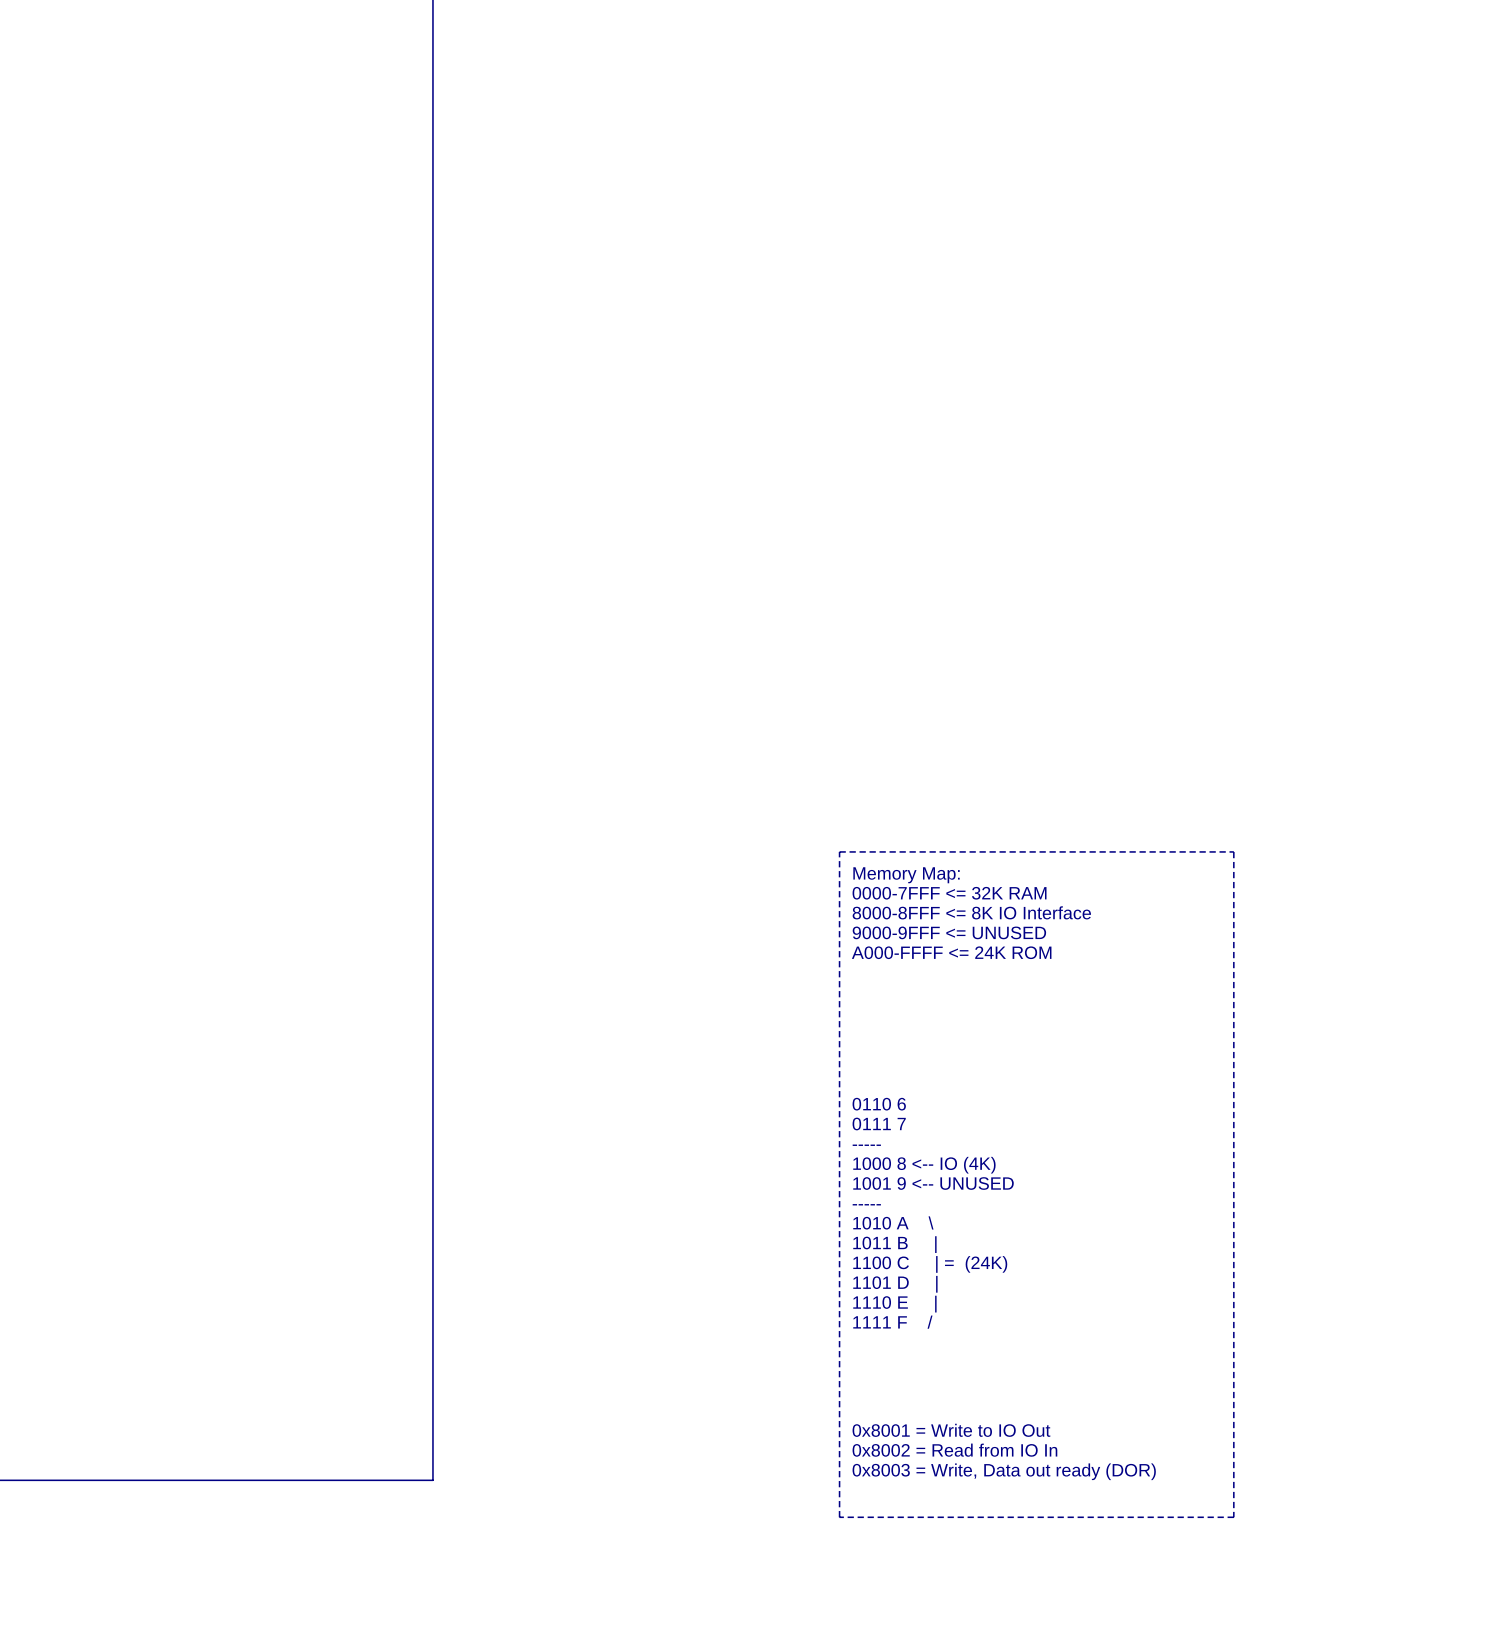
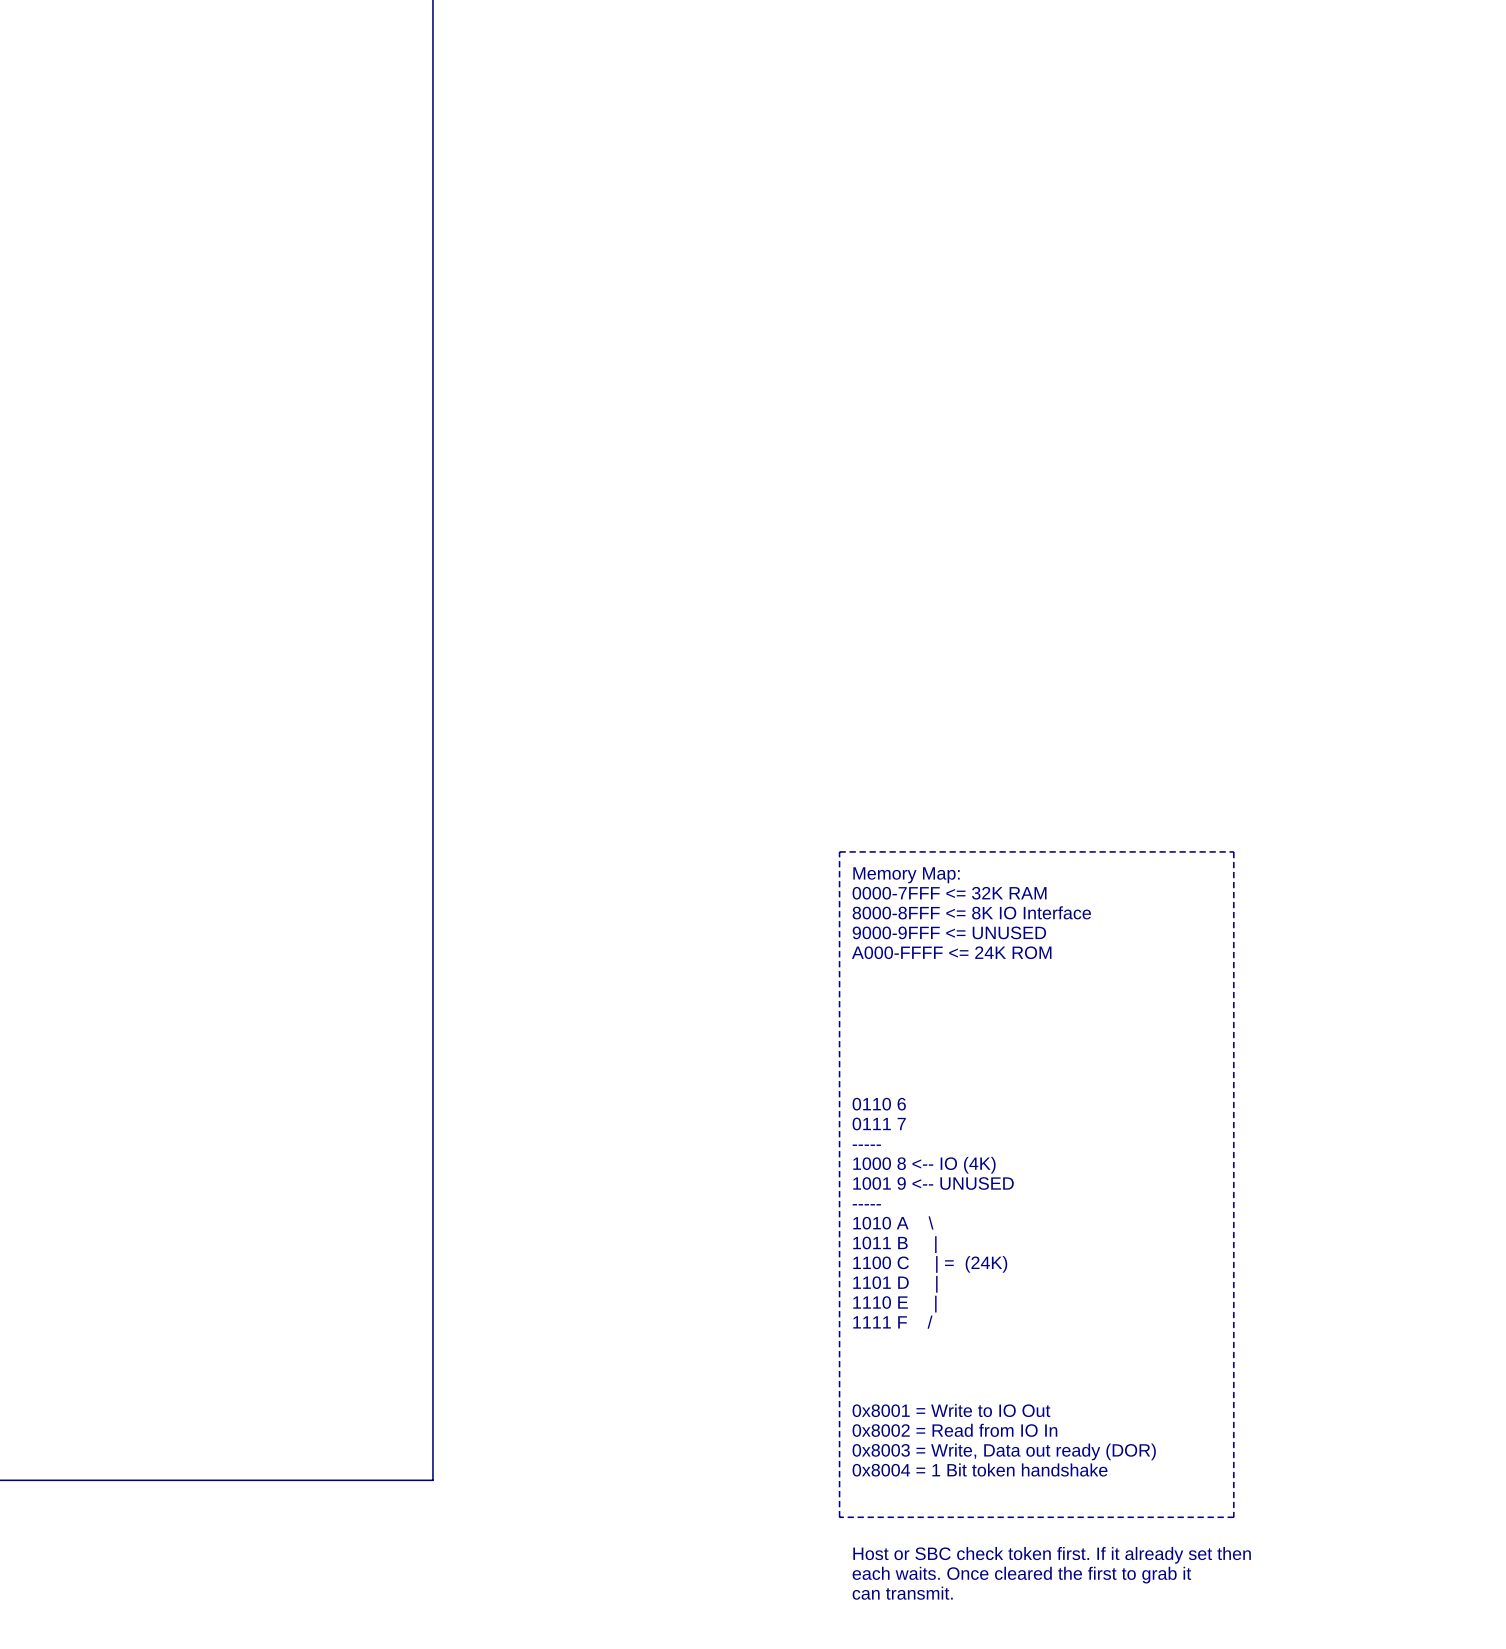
text: none -> 0x8001 = Write to IO Out (951, 1410)
text: 0x8001 = Write to IO Out (951, 1430) -> 0x8002 = Read from IO In (954, 1430)
text: 0x8002 = Read from IO In (954, 1450) -> 0x8003 = Write, Data out ready (DOR) (1004, 1451)
text: 0x8003 = Write, Data out ready (DOR) (1004, 1471) -> 0x8004 = 1 Bit token handshake (980, 1469)
text: none -> Host or SBC check token first. If it already set then (1052, 1555)
text: none -> each waits. Once cleared the first to grab it (1021, 1575)
text: none -> can transmit. (902, 1593)

